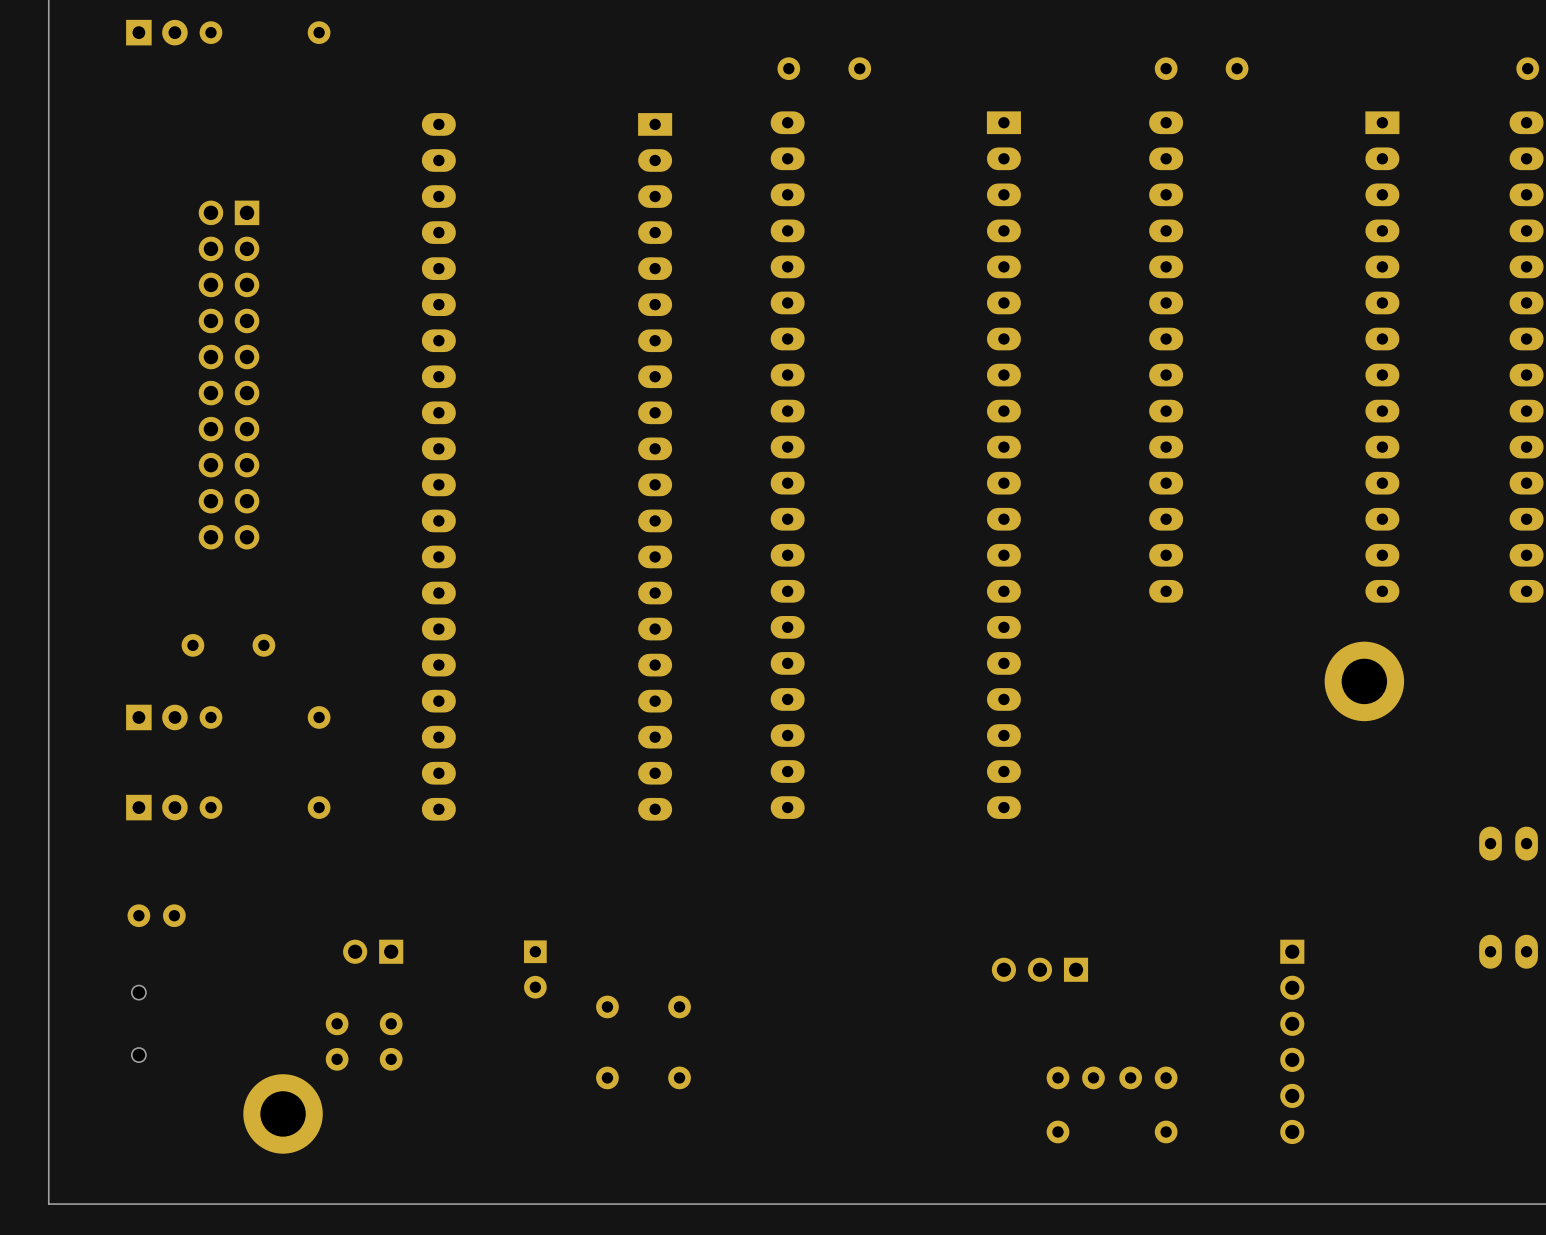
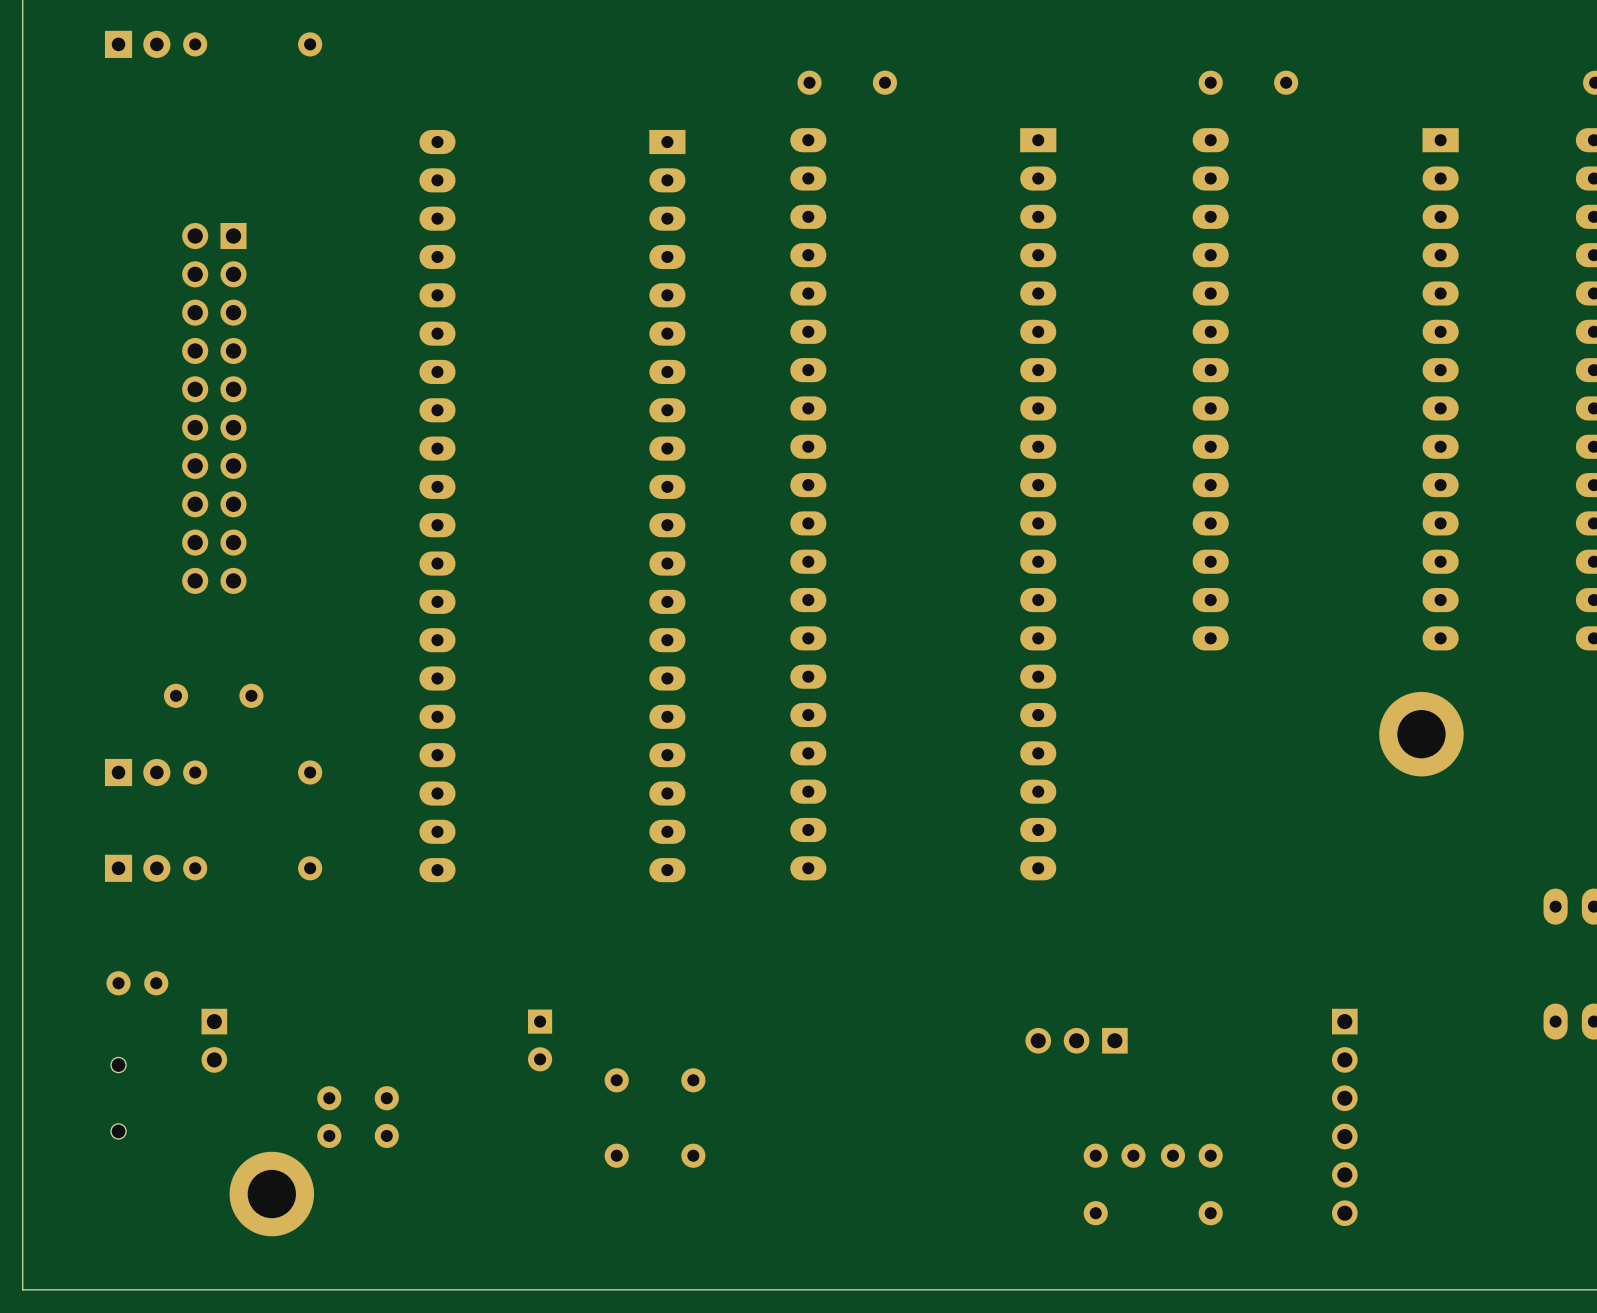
part rotation: 0° (373, 951) -> 90° counterclockwise (214, 1040)
part position: (373, 951) -> (214, 1040)

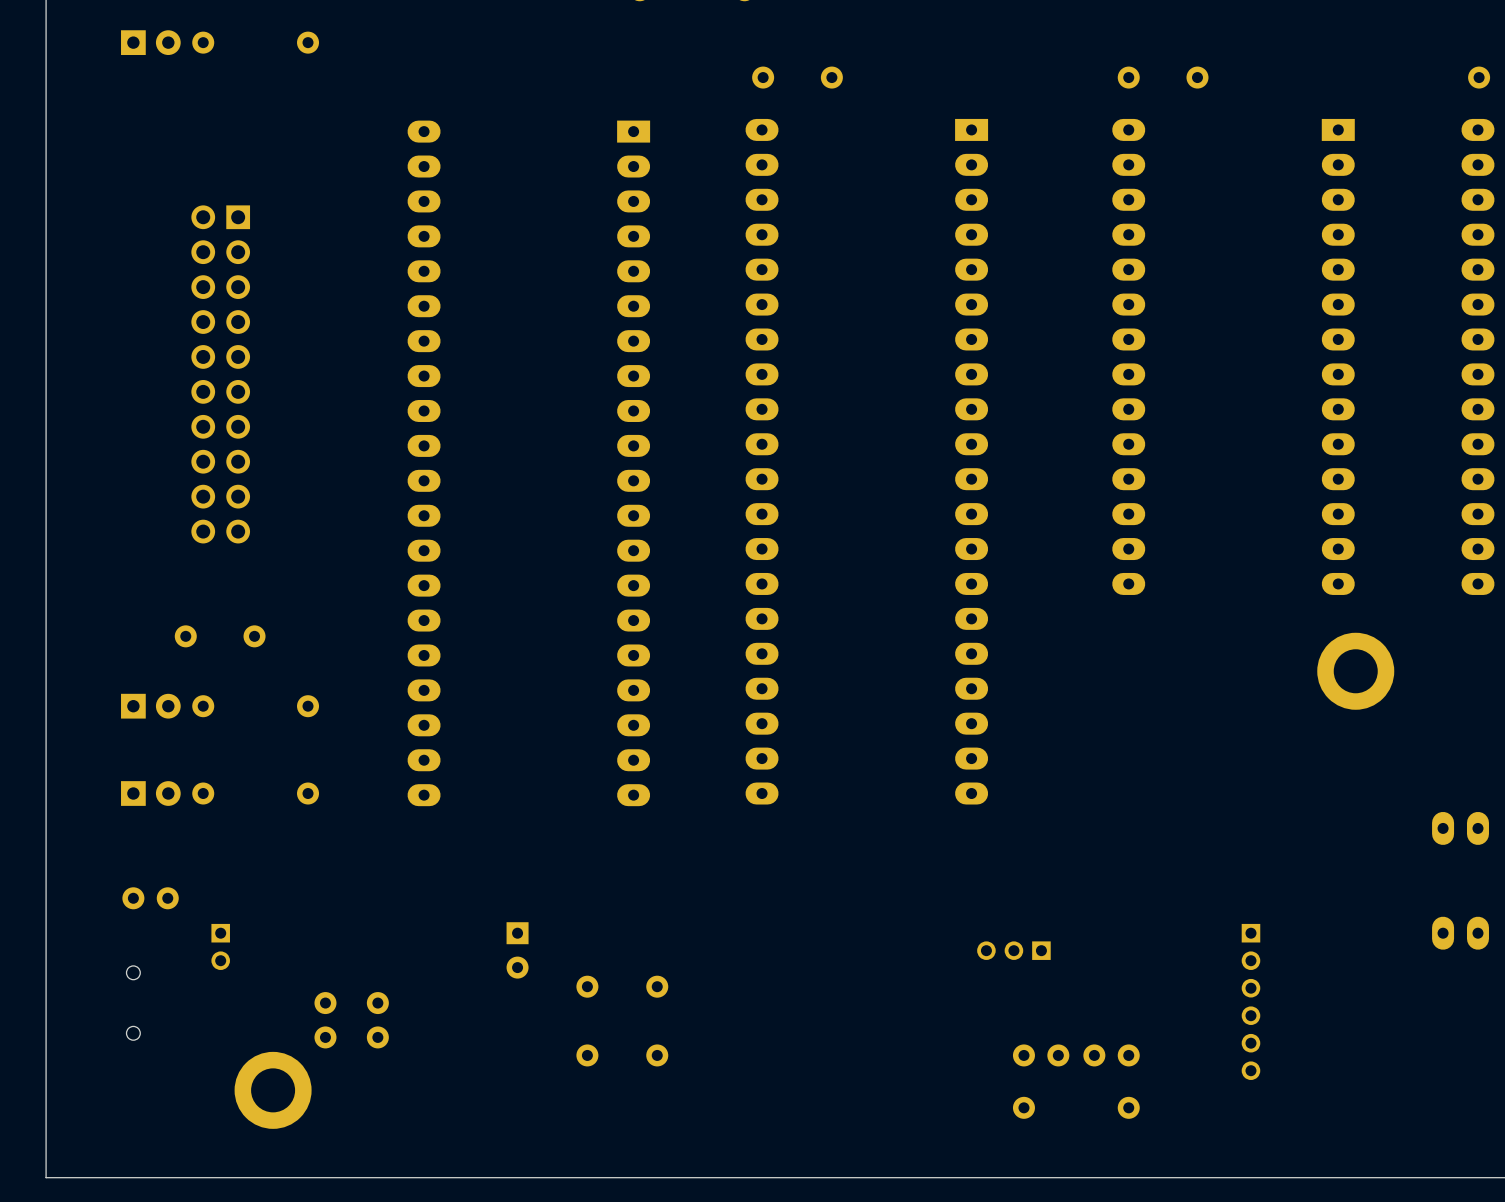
part position: (1421, 734) -> (1355, 671)
part footprint: [201, 1008, 228, 1073] -> [211, 923, 230, 970]
part footprint: [1025, 1027, 1128, 1054] -> [977, 941, 1051, 960]
part: none -> (1250, 1001)
part: (1344, 1117) -> none

